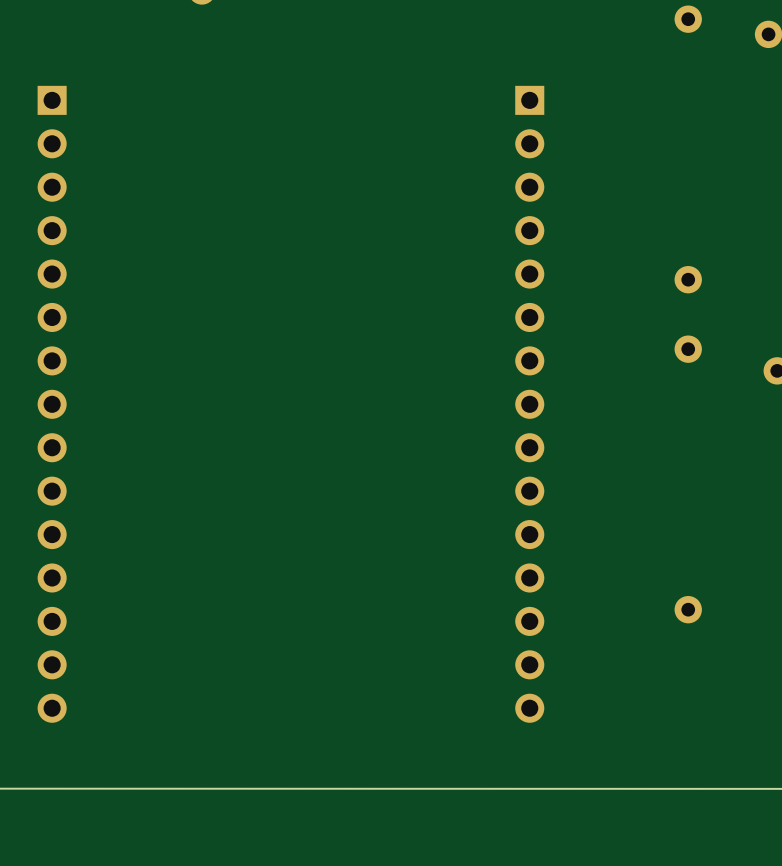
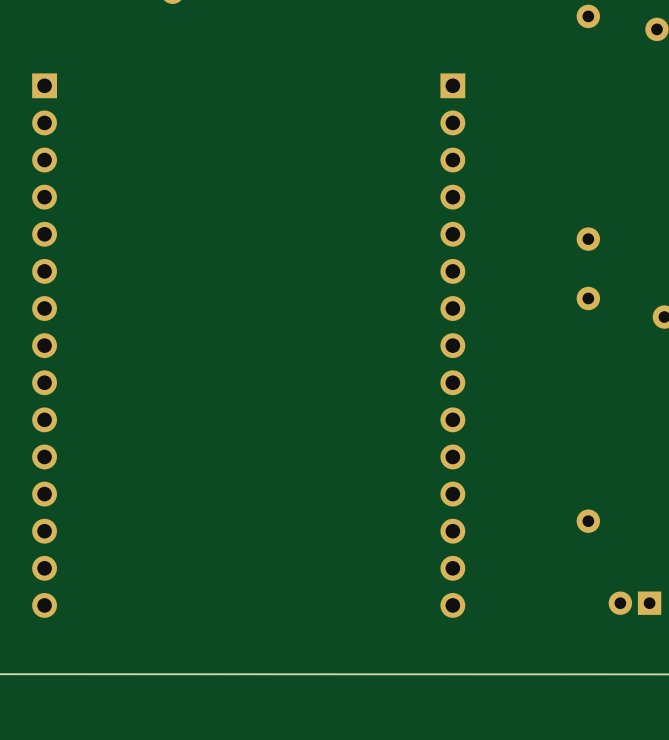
part: none -> (634, 603)

